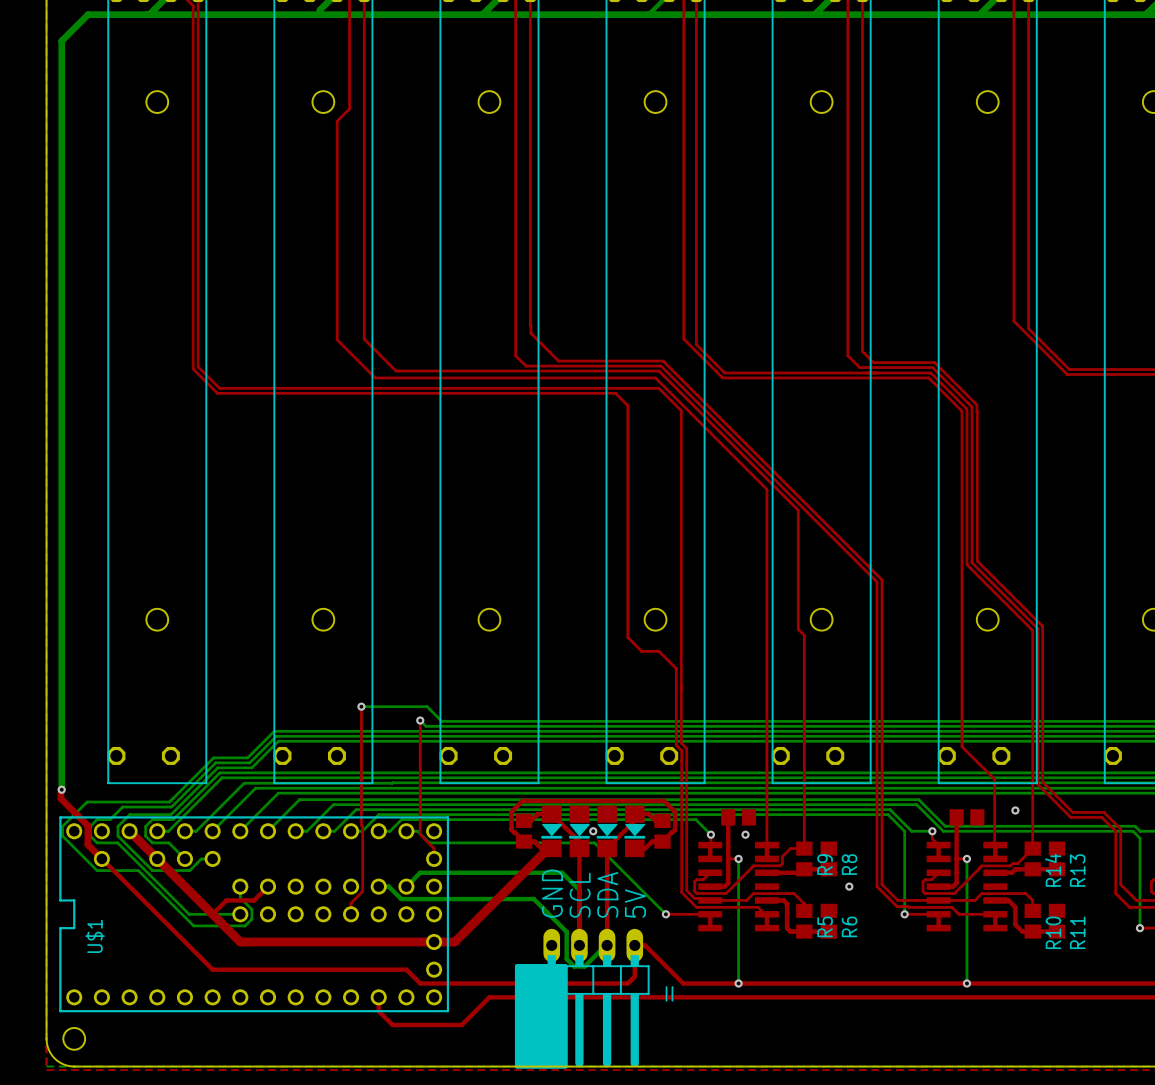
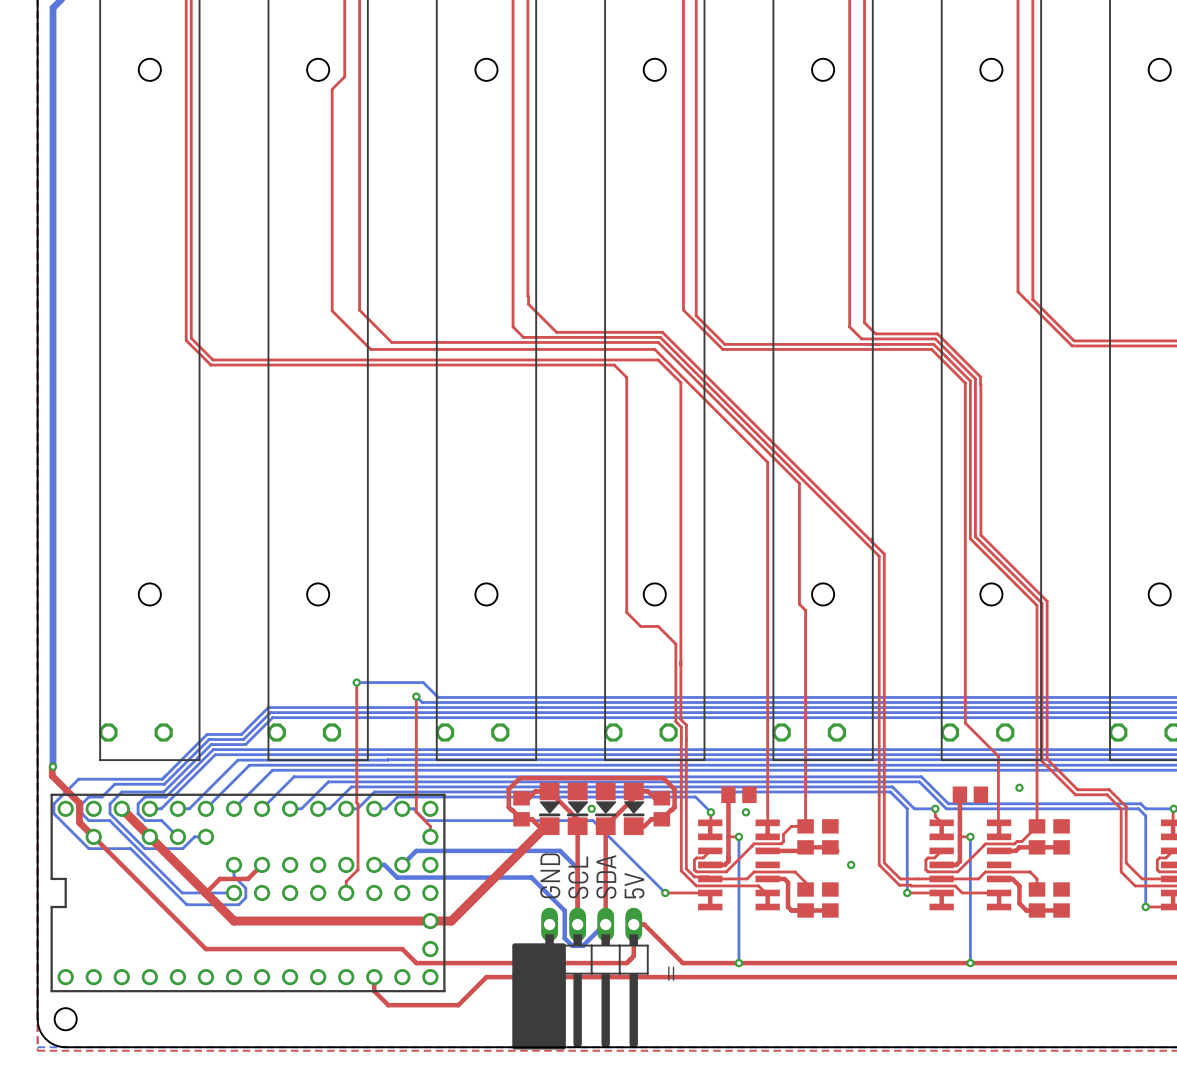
R9 name: R9 (825, 864) -> none
R8 name: R8 (849, 864) -> none
R14 name: R14 (1053, 870) -> none
R13 name: R13 (1077, 870) -> none
R5 name: R5 (825, 926) -> none
R6 name: R6 (849, 926) -> none
R10 name: R10 (1053, 932) -> none
R11 name: R11 (1077, 932) -> none
U$1 name: U$1 (94, 936) -> none

